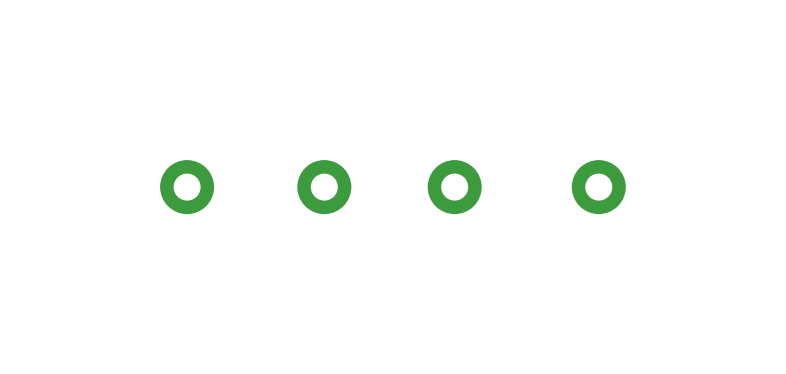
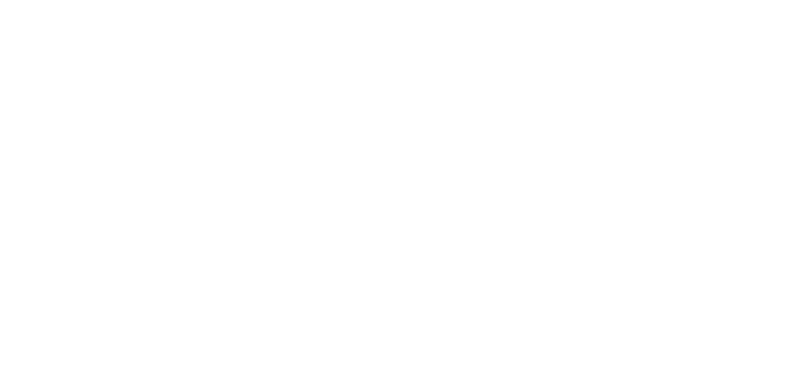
part: (187, 187) -> none
part: (324, 187) -> none
part: (454, 187) -> none
part: (598, 187) -> none

